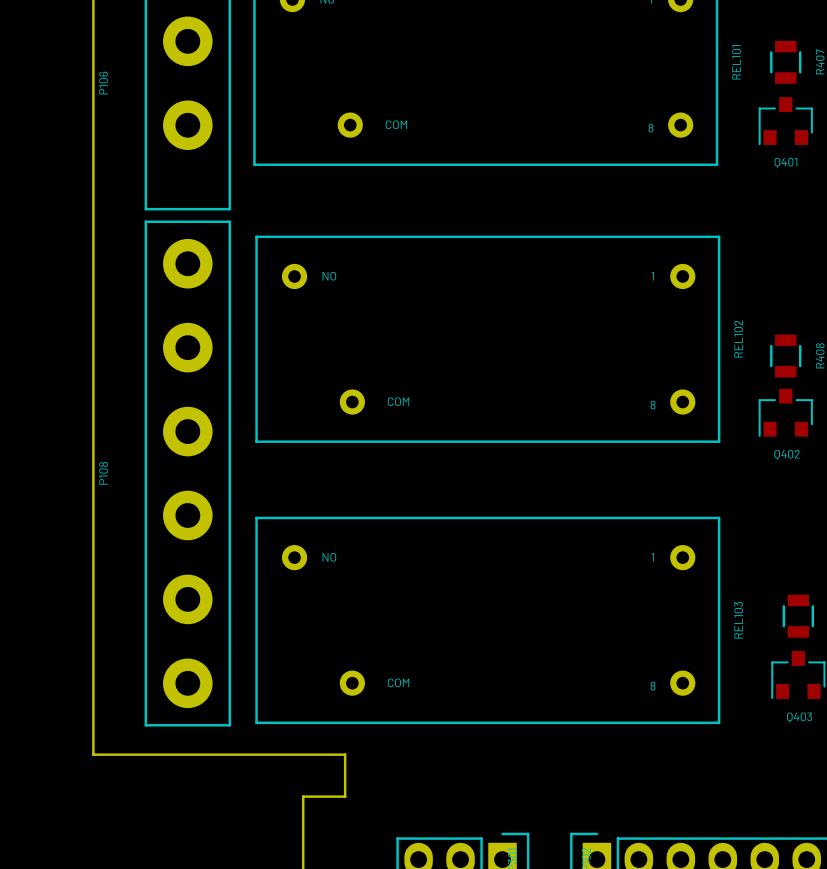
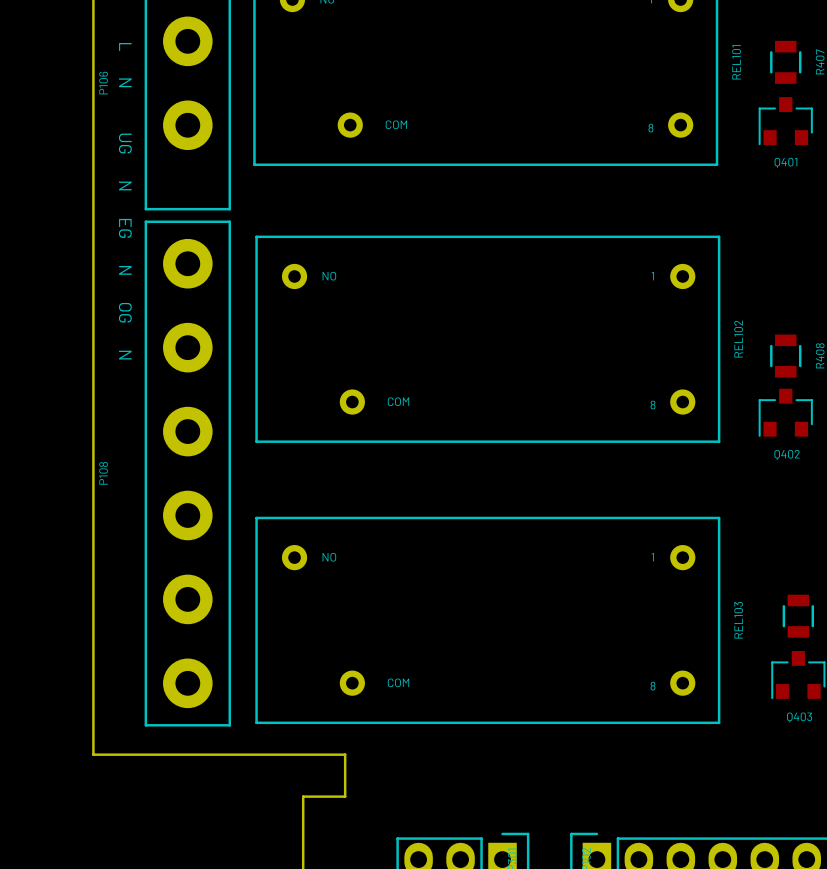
text: none -> L N UG N EG N OG N (125, 201)

